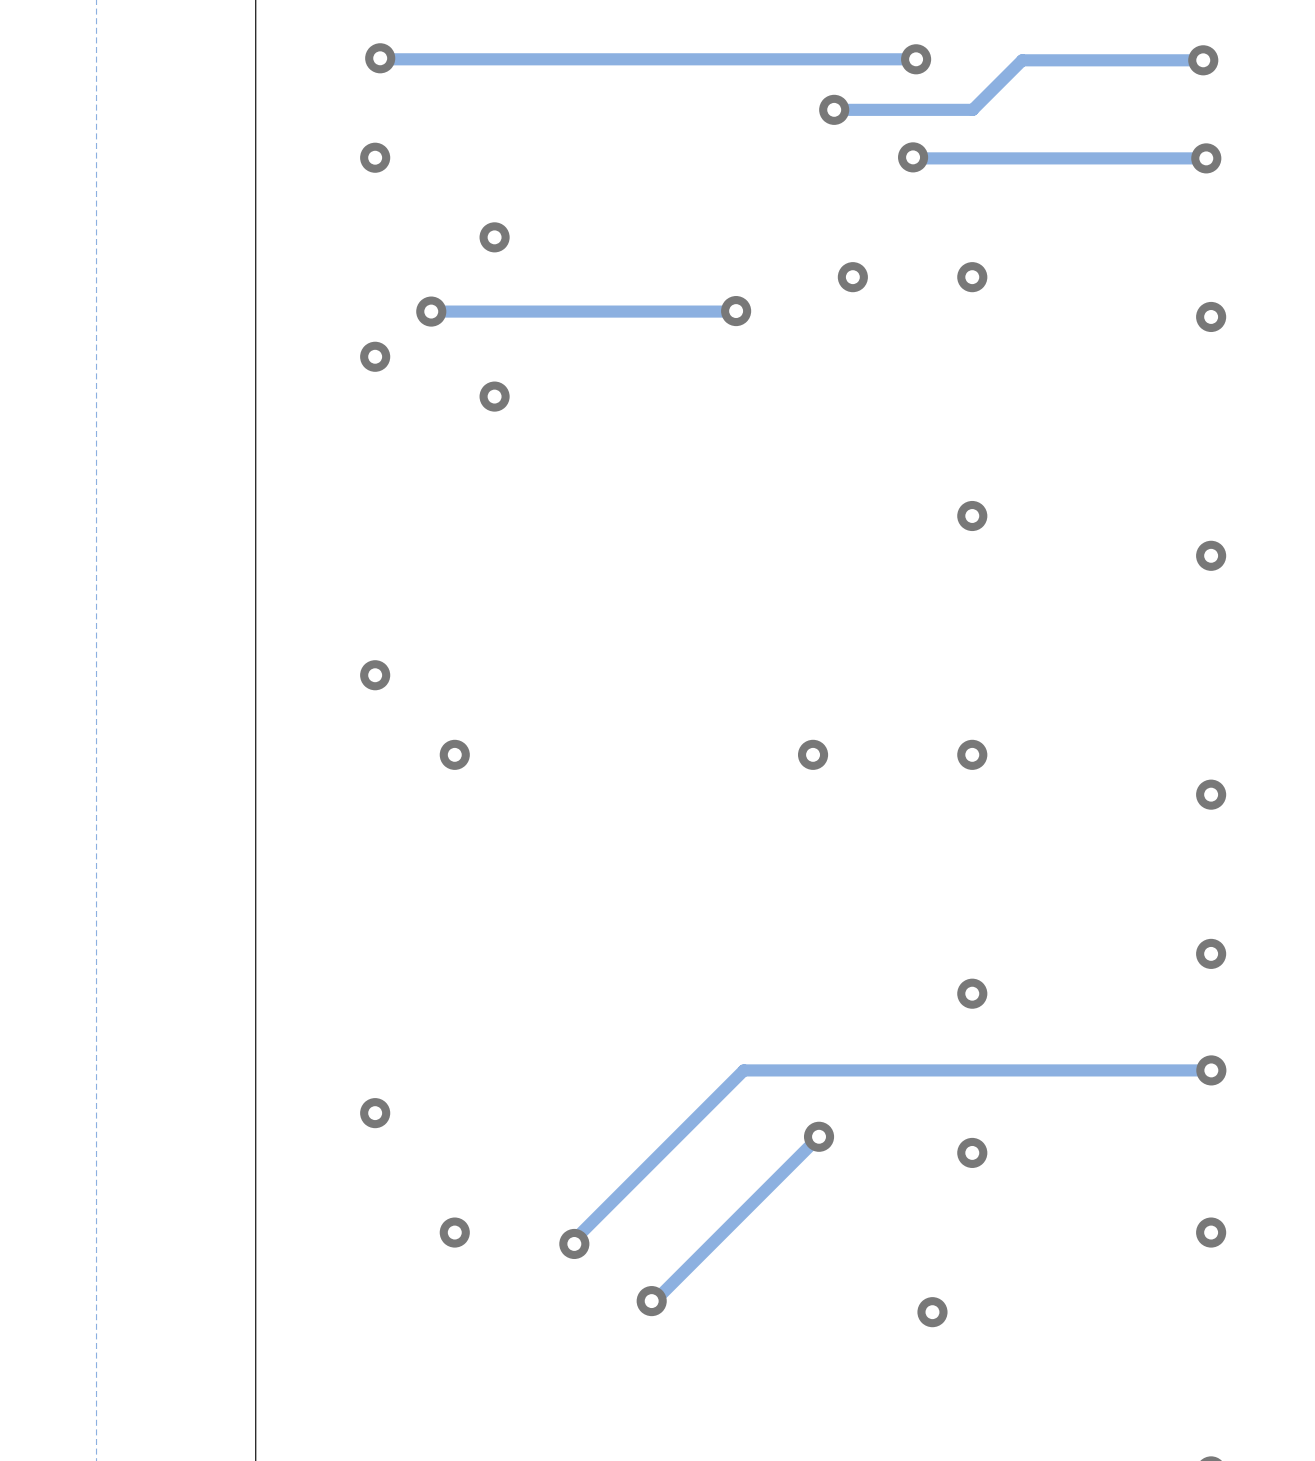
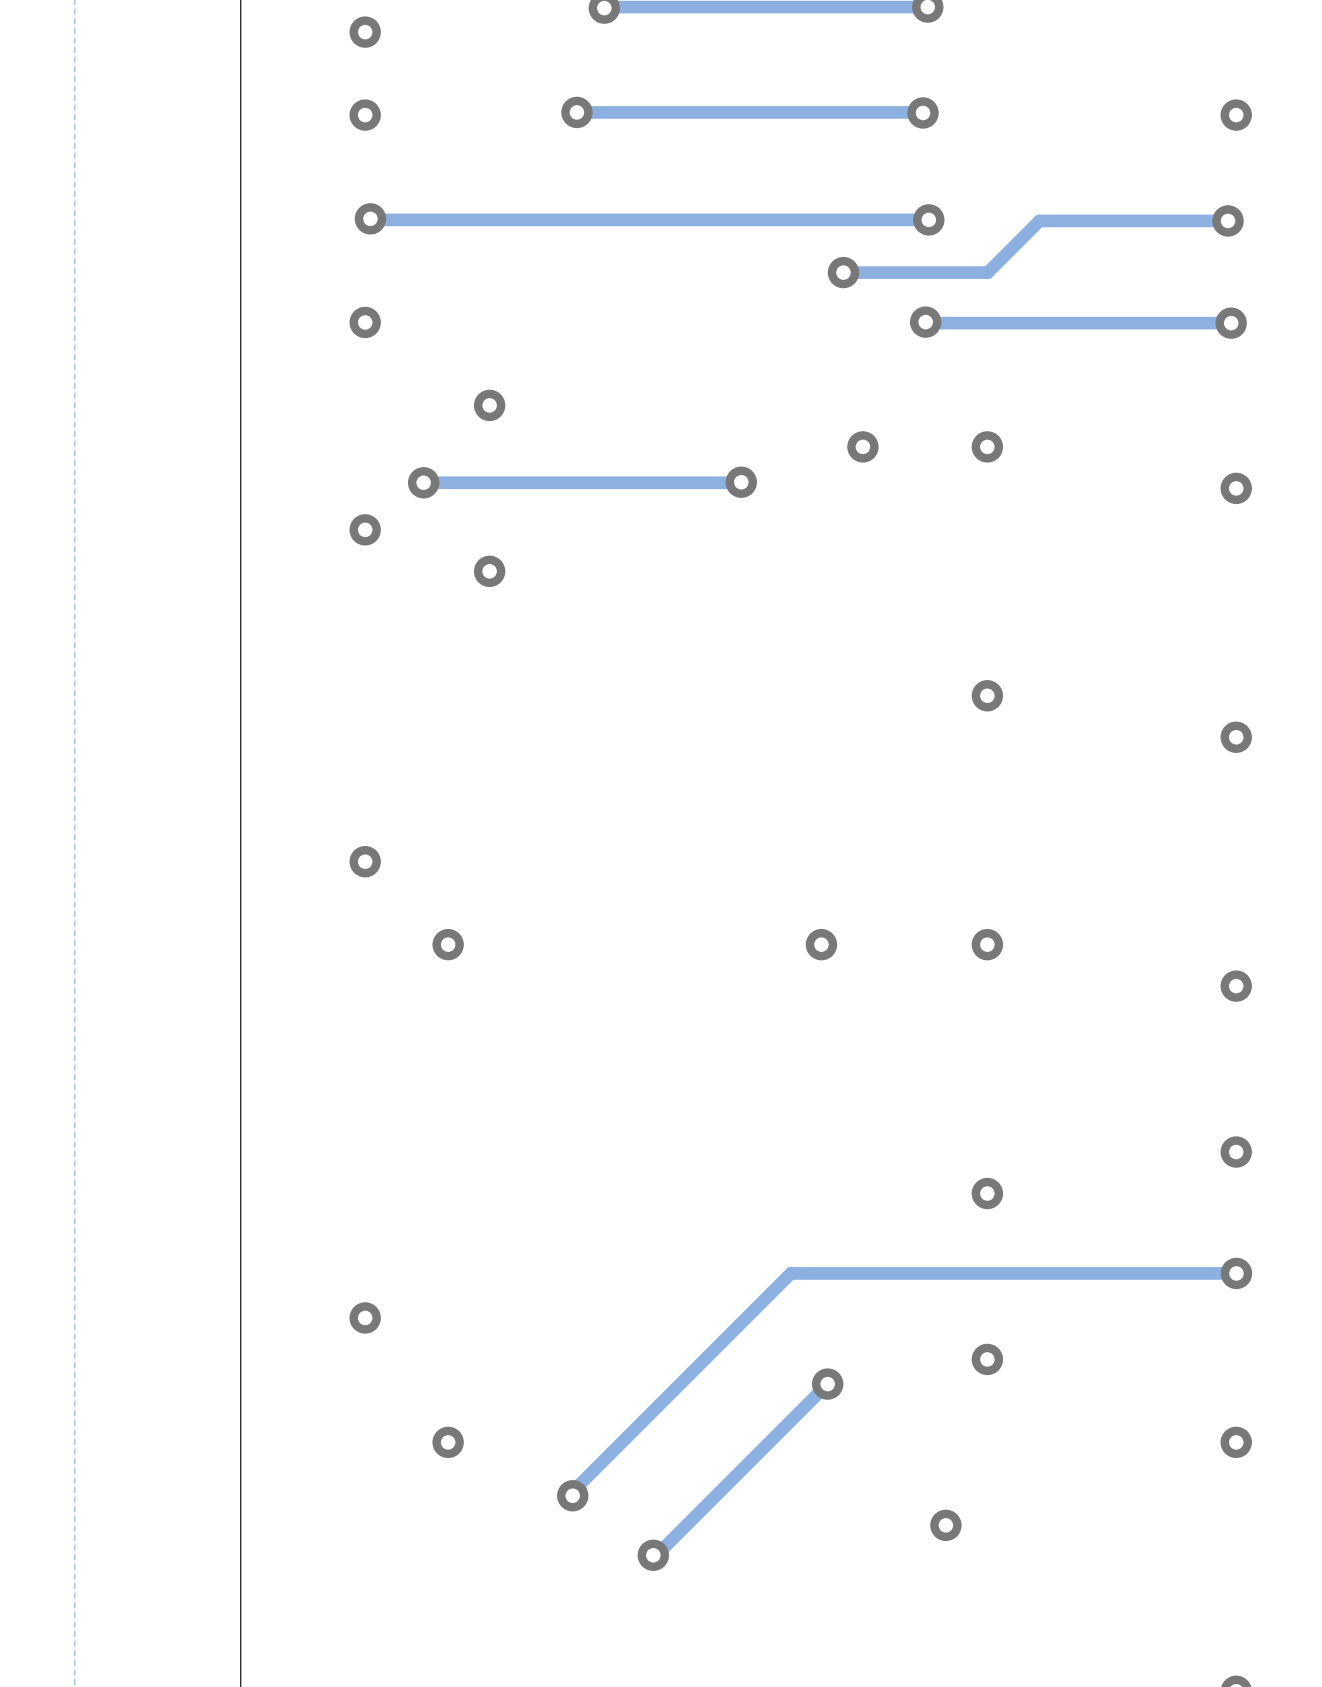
track: (783, 1070) (743, 1070) (572, 1241) (574, 1243) -> (790, 1273) (570, 1493) (572, 1495)
track: (819, 1136) (654, 1301) (651, 1301) -> none
via position: (819, 1136) -> (827, 1384)
track: none -> (827, 1384) (654, 1556) (653, 1555)
via: (574, 1243) -> none
via: none -> (572, 1495)
via: (651, 1301) -> none
via: none -> (653, 1555)

